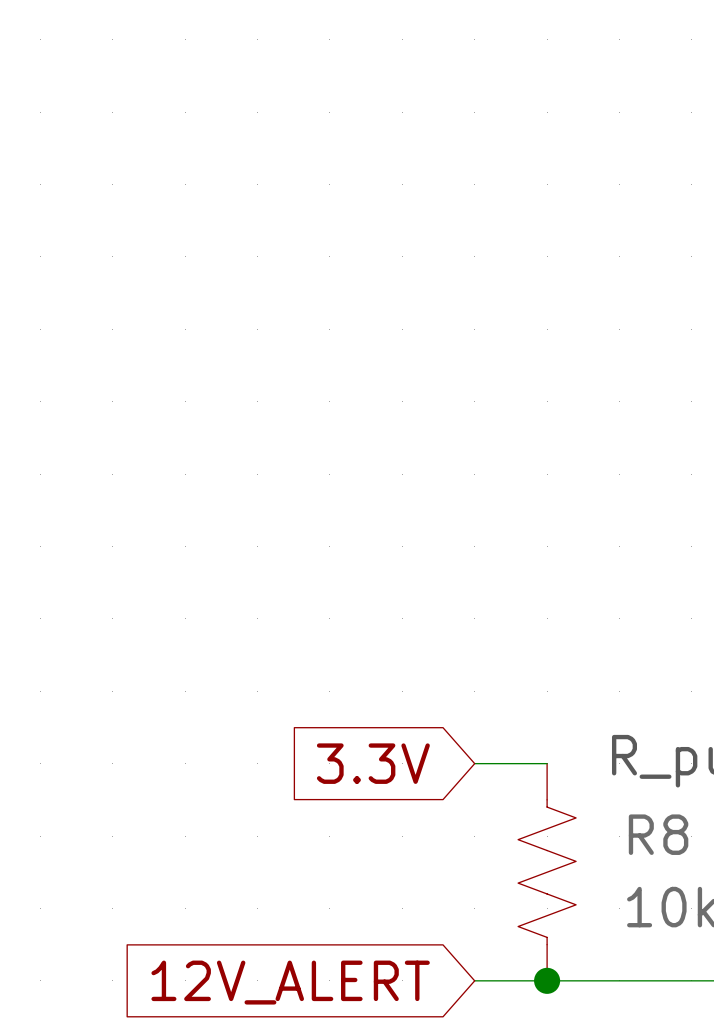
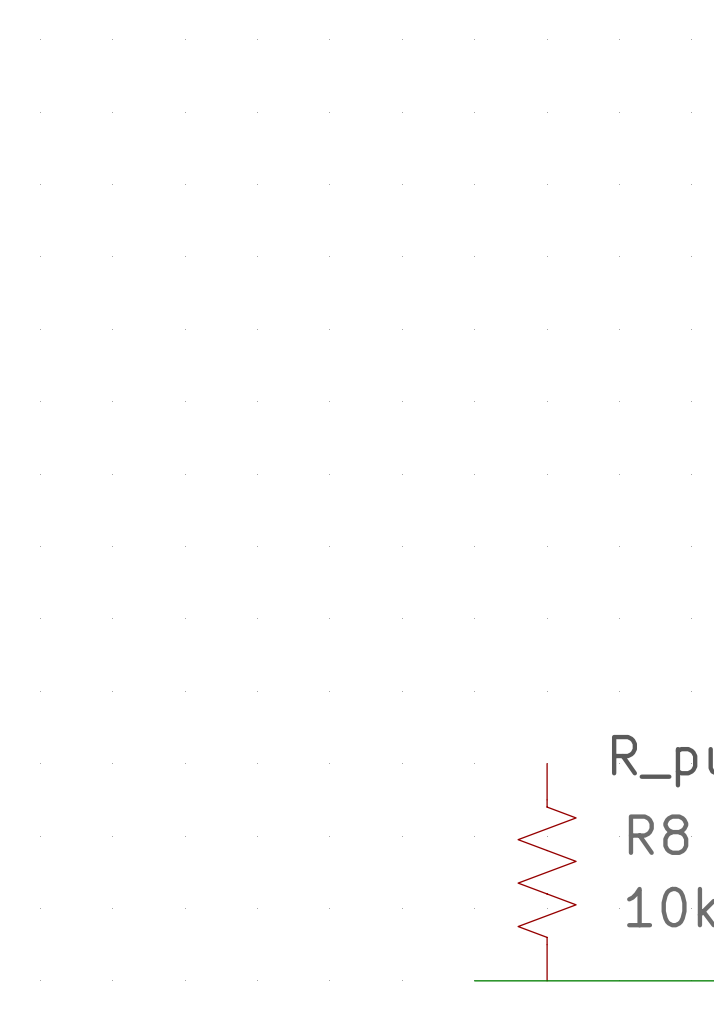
global label: 3.3V (373, 763) -> none
wire: (474, 763) (547, 763) -> none
junction: (547, 980) -> none
global label: 12V_ALERT (290, 982) -> none

